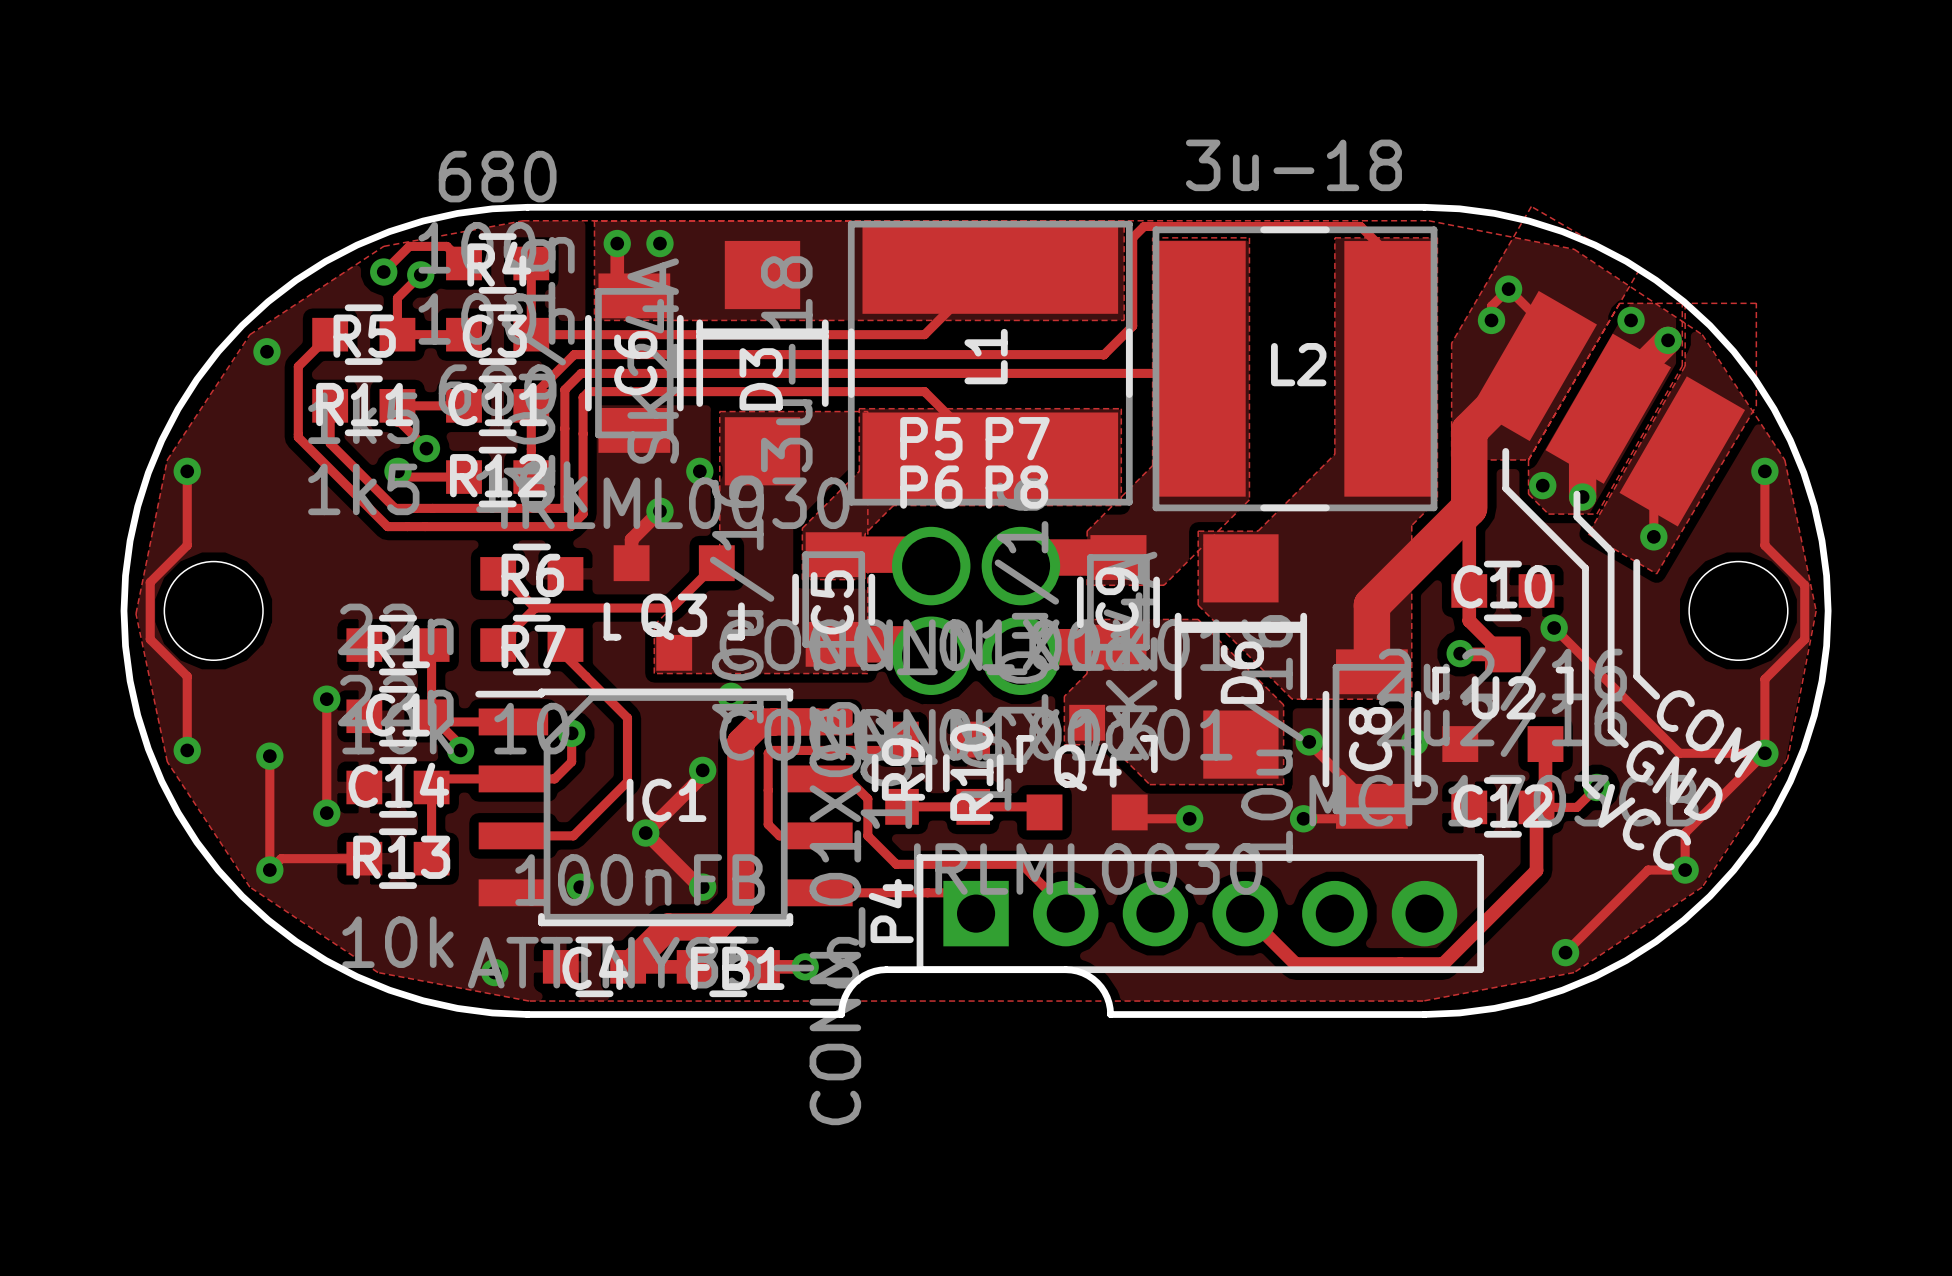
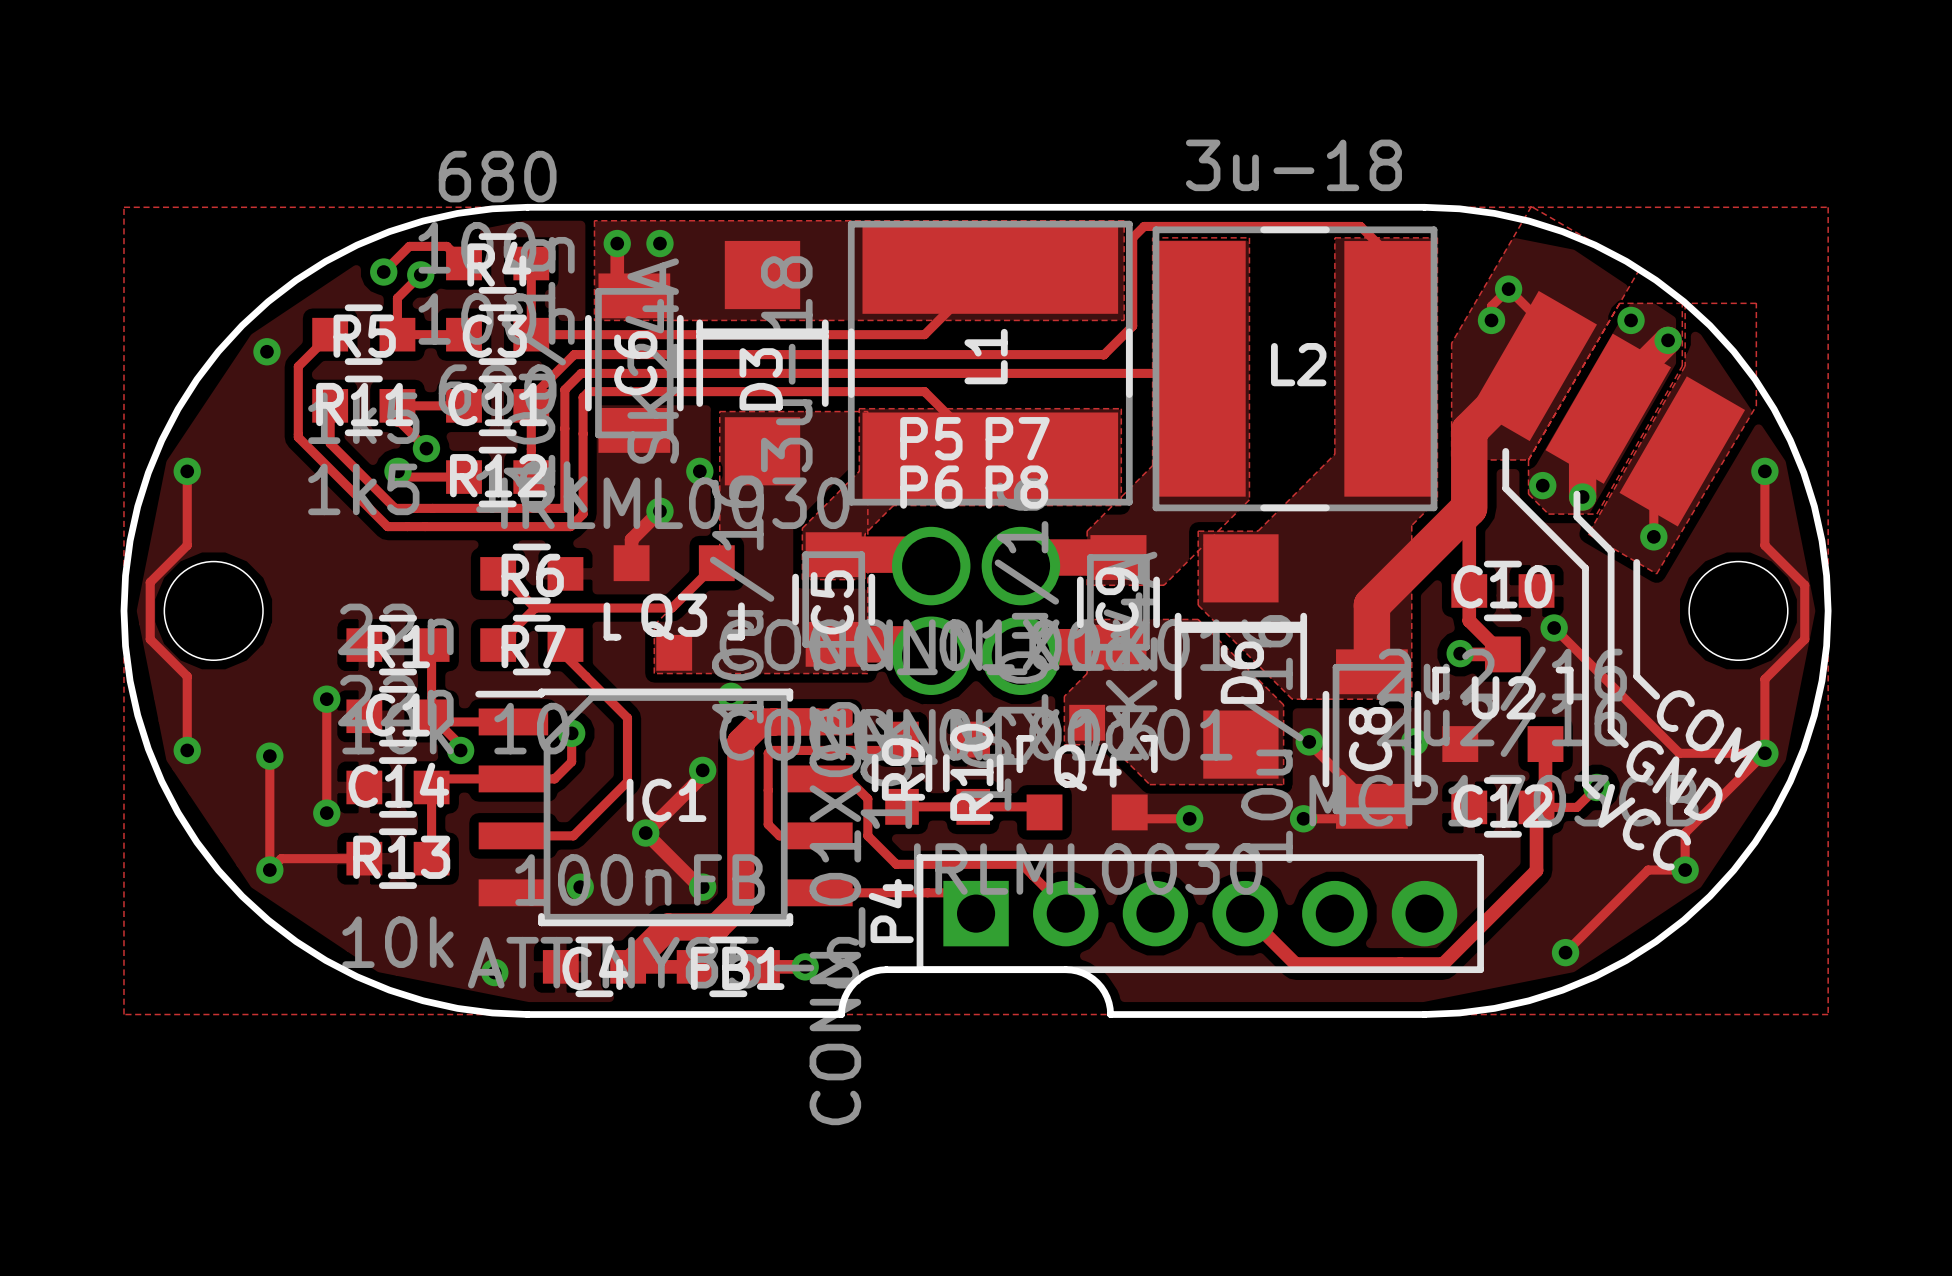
zone outline: none -> (123, 207) (123, 1014) (1828, 1014) (1828, 207) (123, 207)
zone outline: (594, 220) (523, 220) (383, 246) (249, 334) (167, 459) (135, 613) (167, 761) (249, 887) (378, 972) (528, 1001) (1423, 1001) (1574, 972) (1702, 887) (1787, 758) (1816, 610) (1784, 459) (1702, 334) (1574, 249) (1428, 220) (1124, 220) -> none

